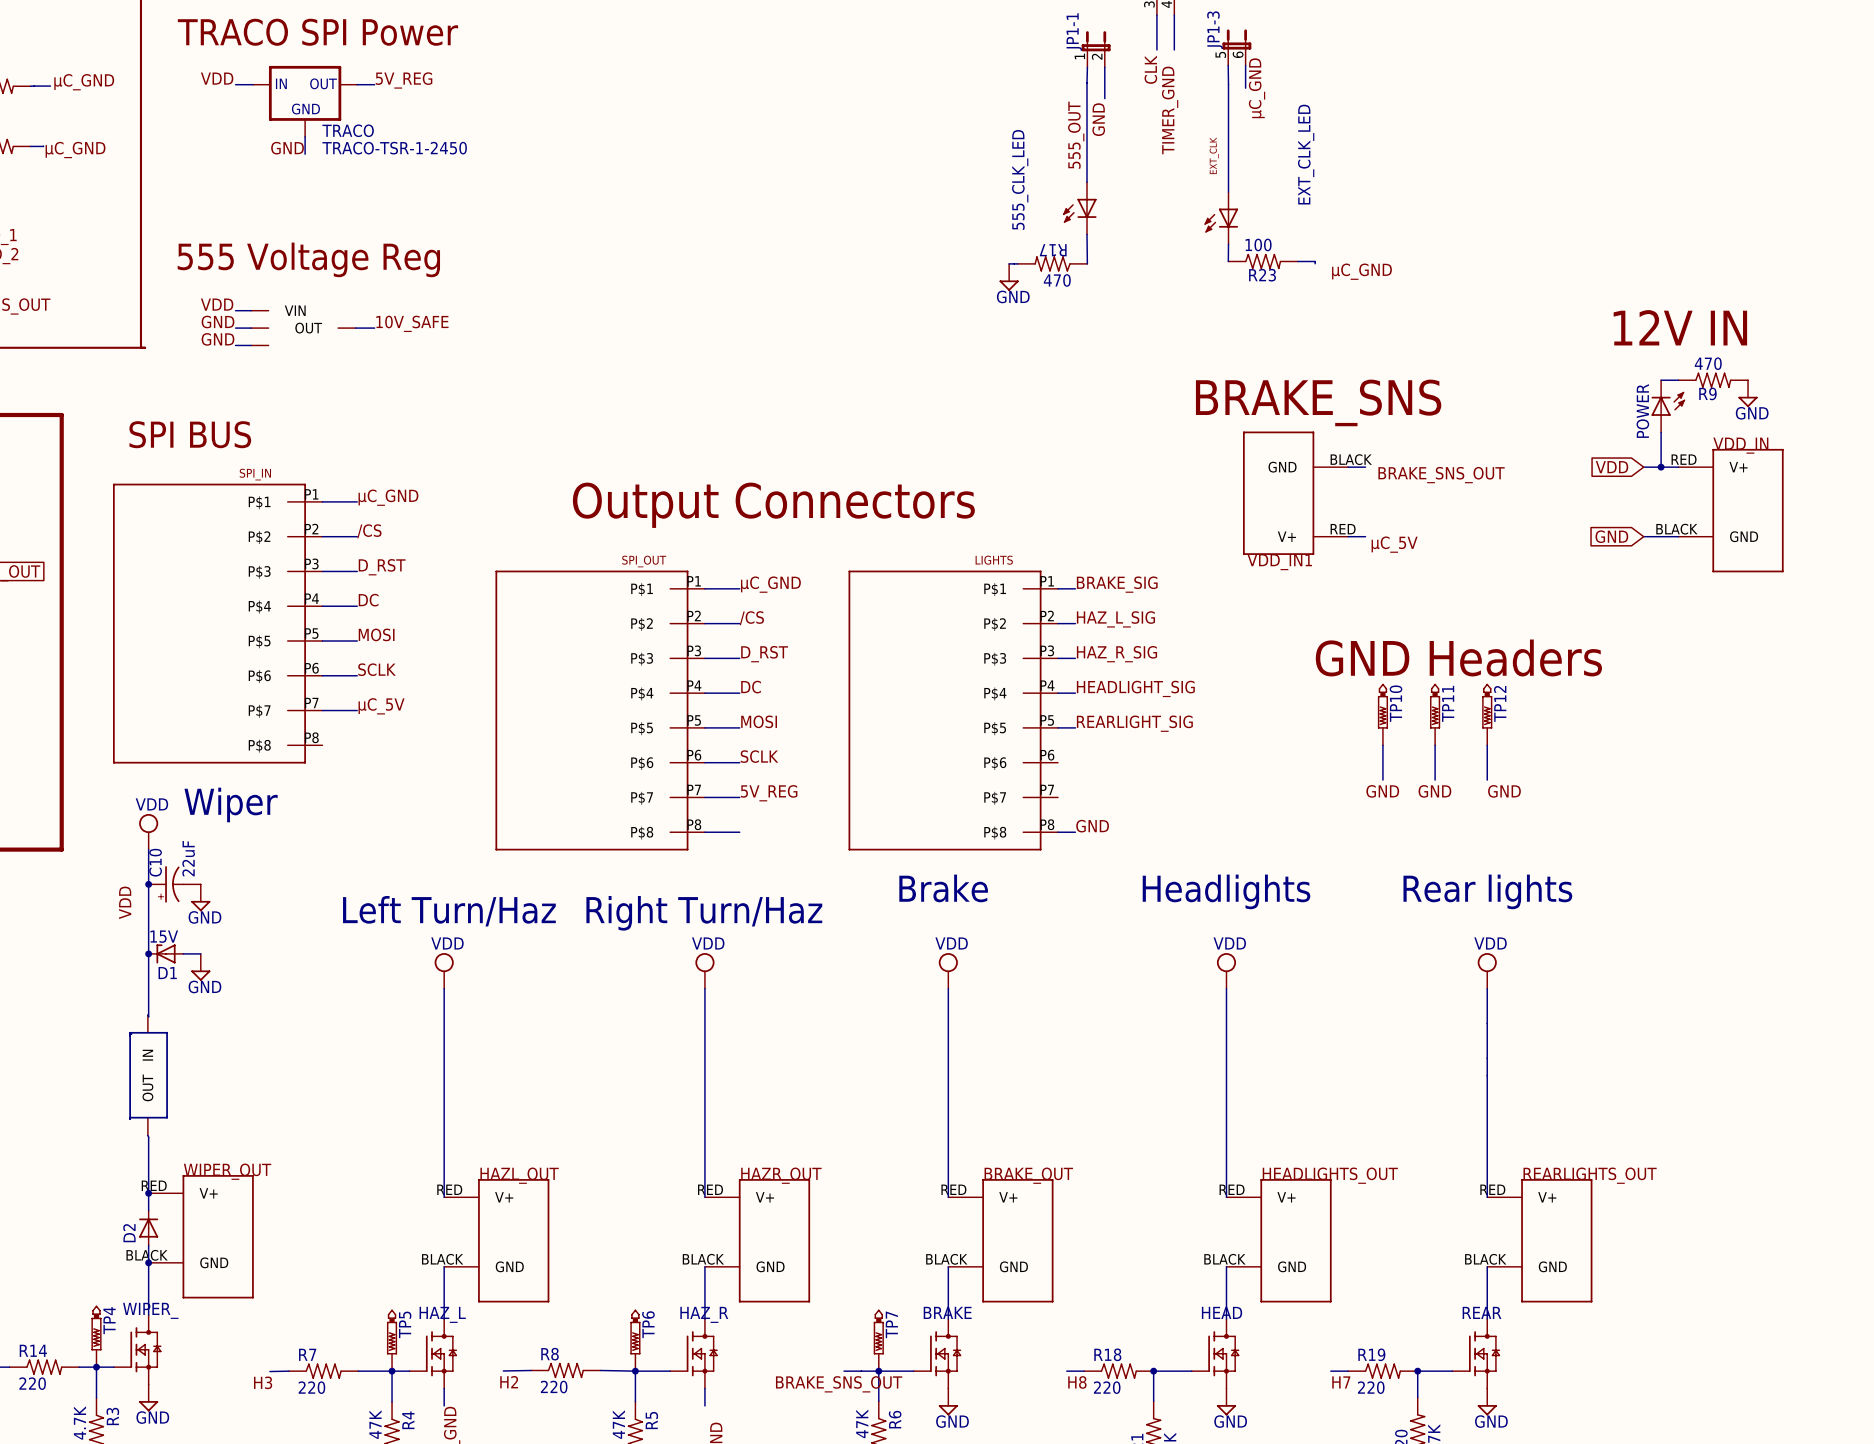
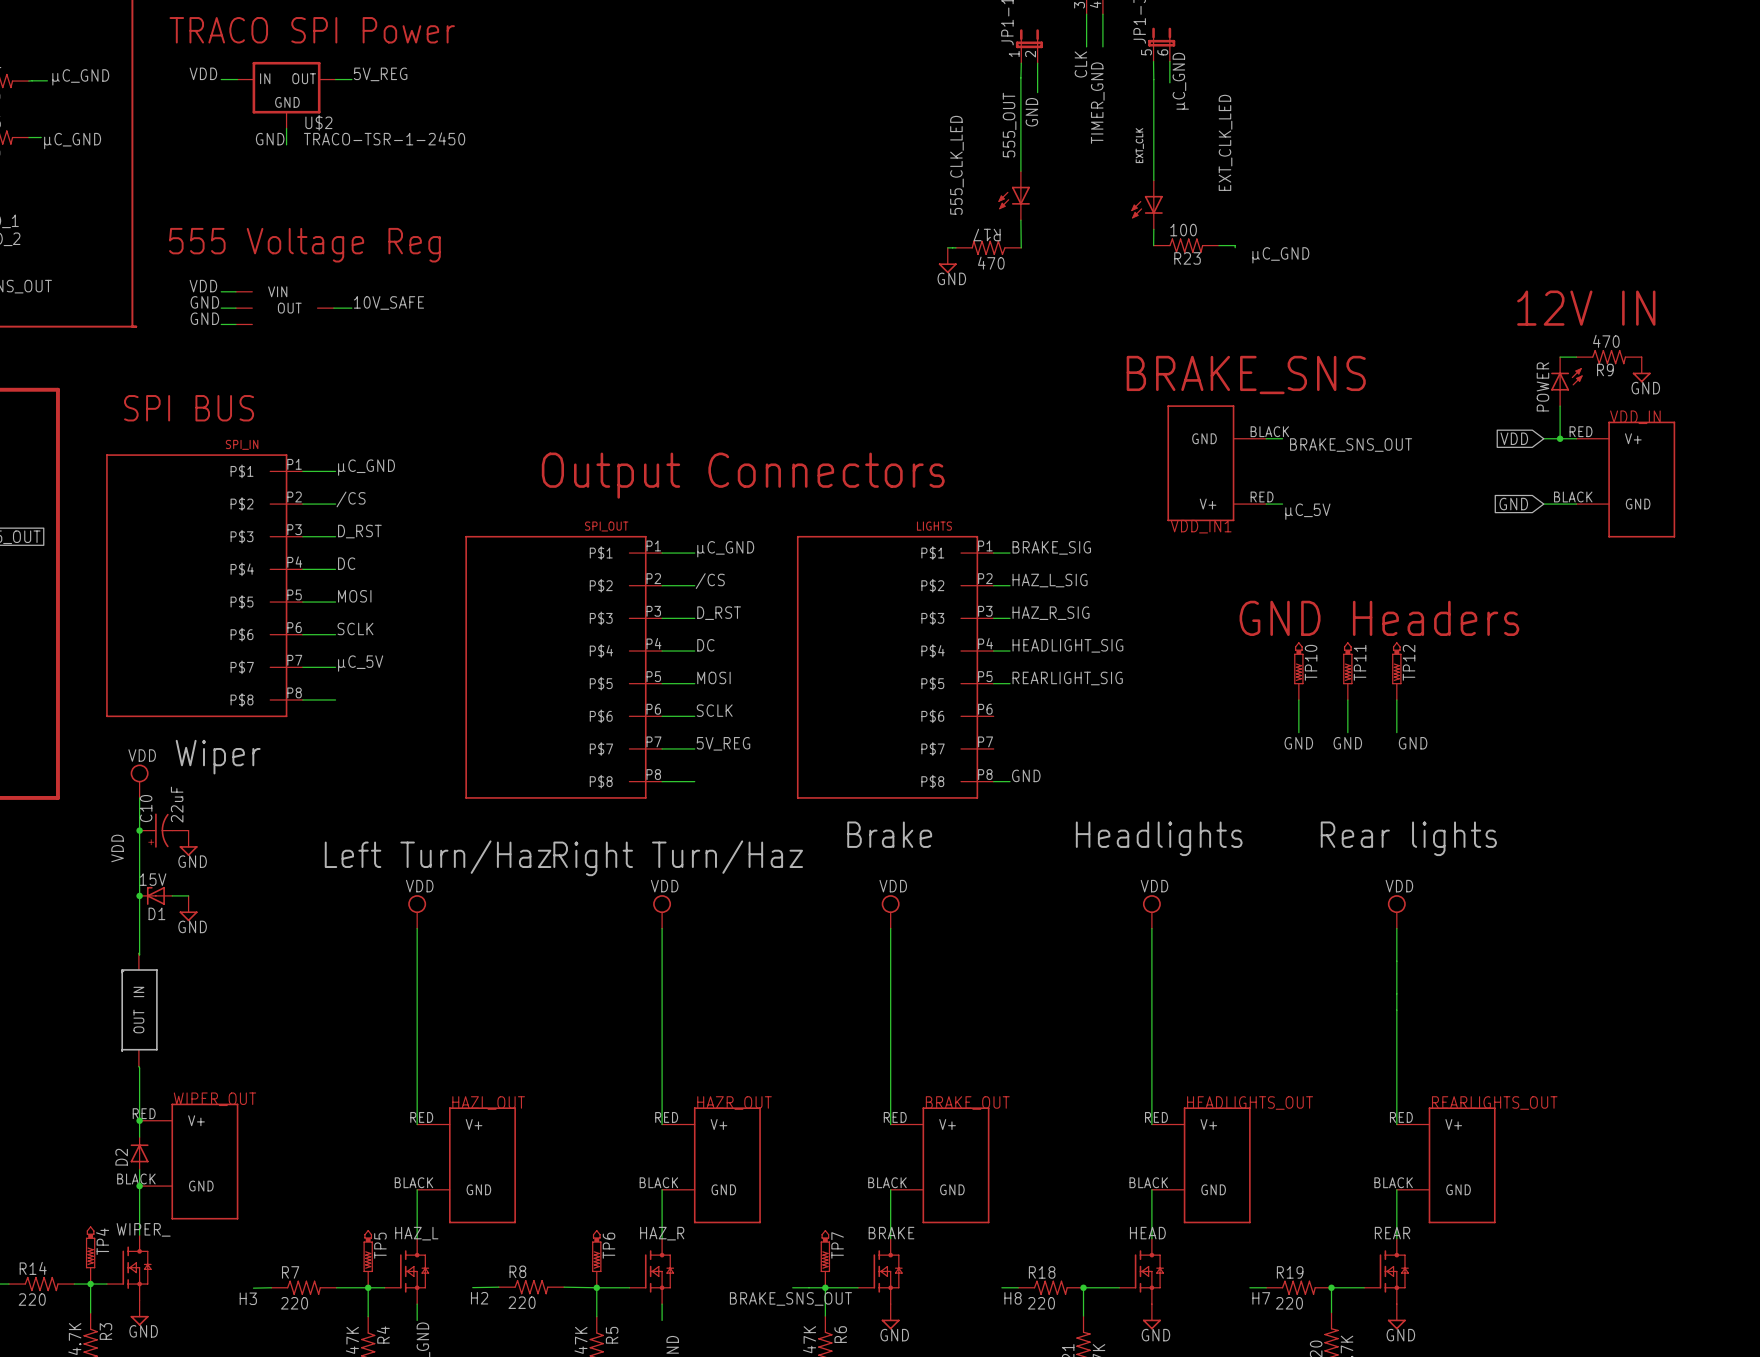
TRACO name: TRACO (348, 130) -> U$2 (318, 122)
wire: none -> (302, 699) (335, 699)

